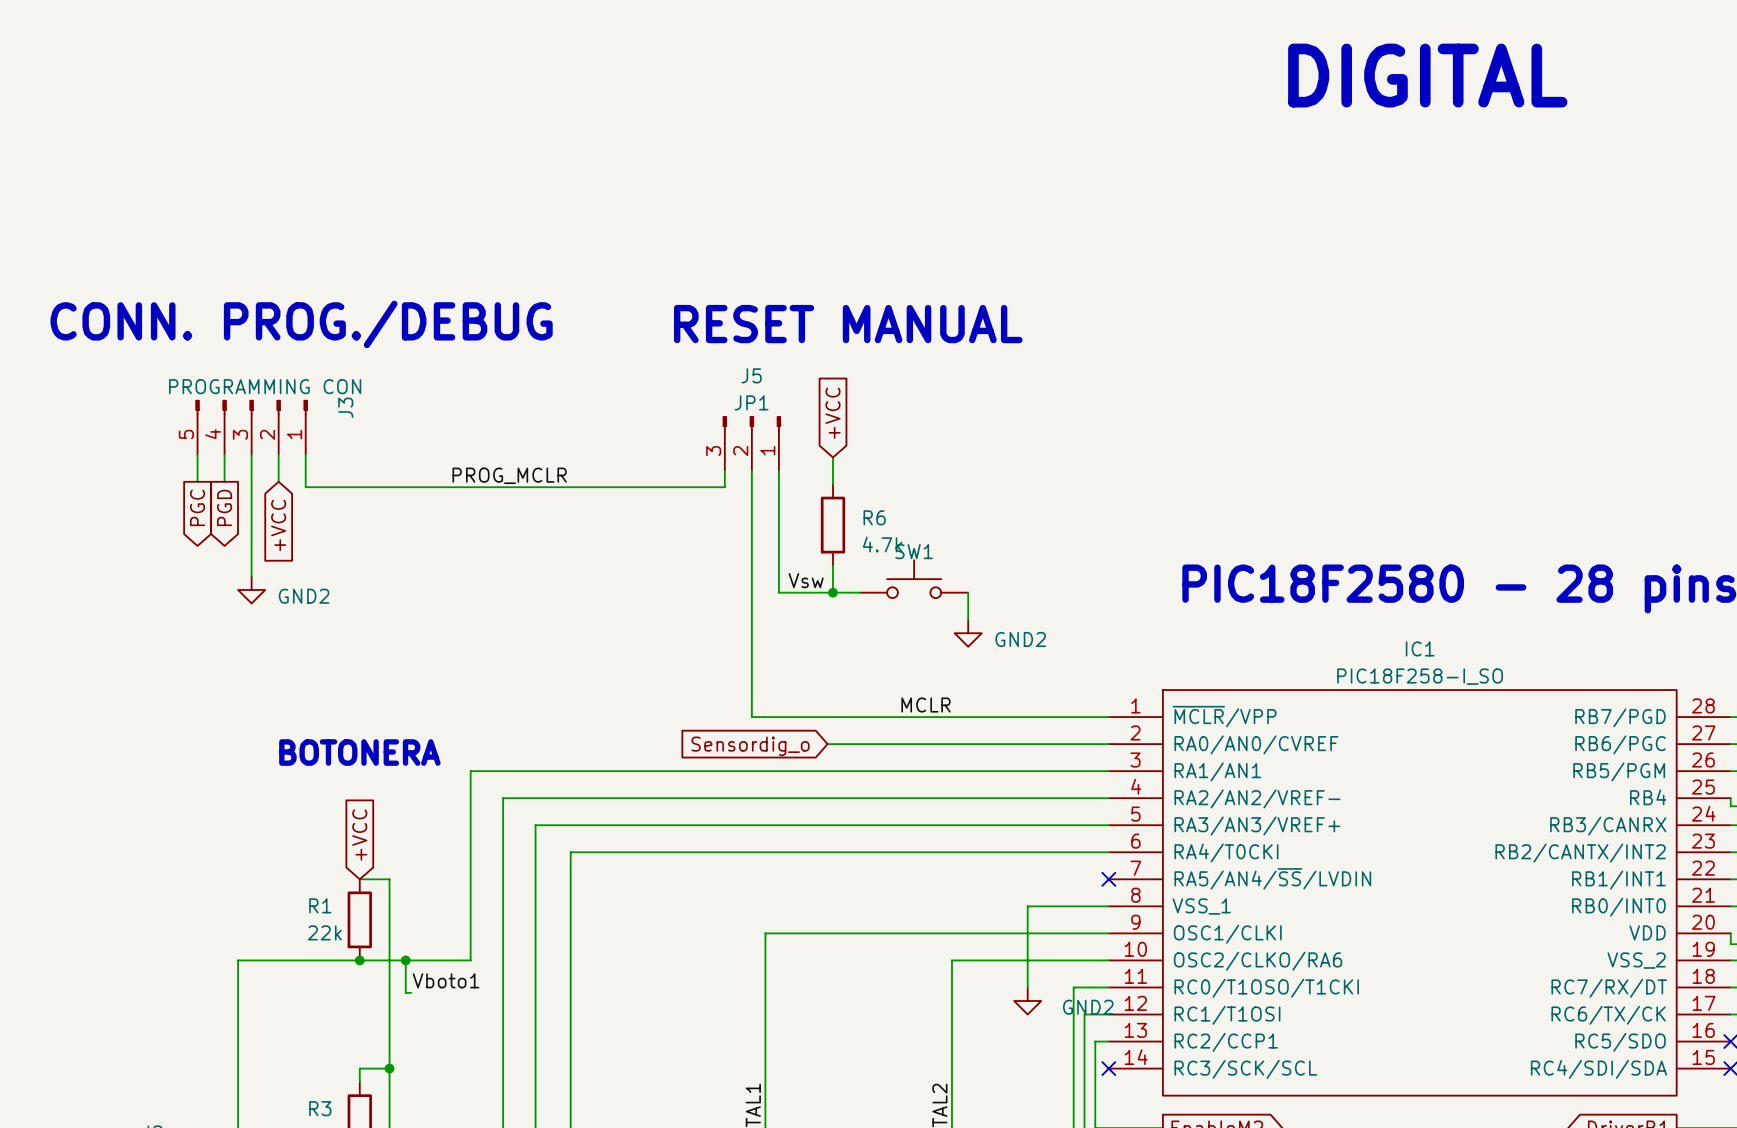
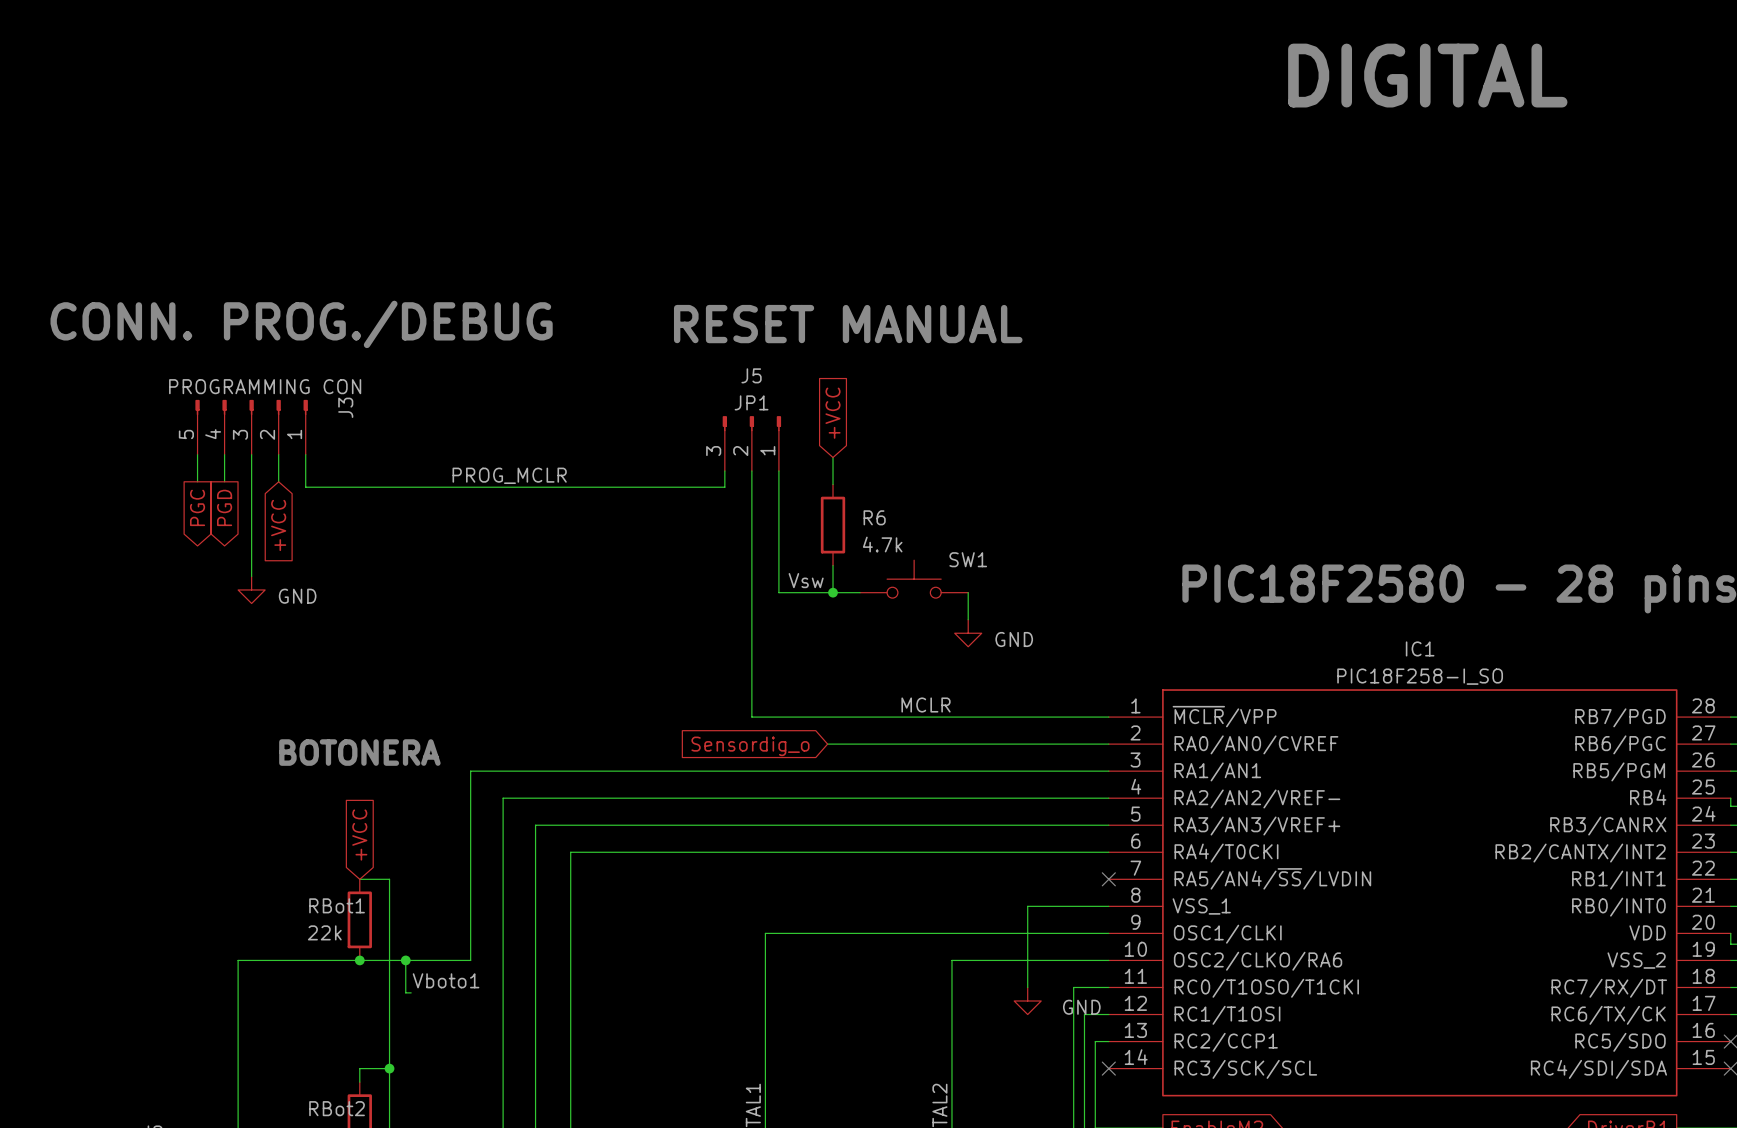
SW1 name position: SW1 (914, 551) -> SW1 (968, 559)
power symbol: GND2 (251, 589) -> GND (251, 589)
power symbol: GND2 (968, 633) -> GND (968, 633)
R1 name: R1 (320, 905) -> RBot1 (337, 905)
power symbol: GND2 (1027, 1000) -> GND (1027, 1000)
R3 name: R3 (320, 1108) -> RBot2 (337, 1108)

